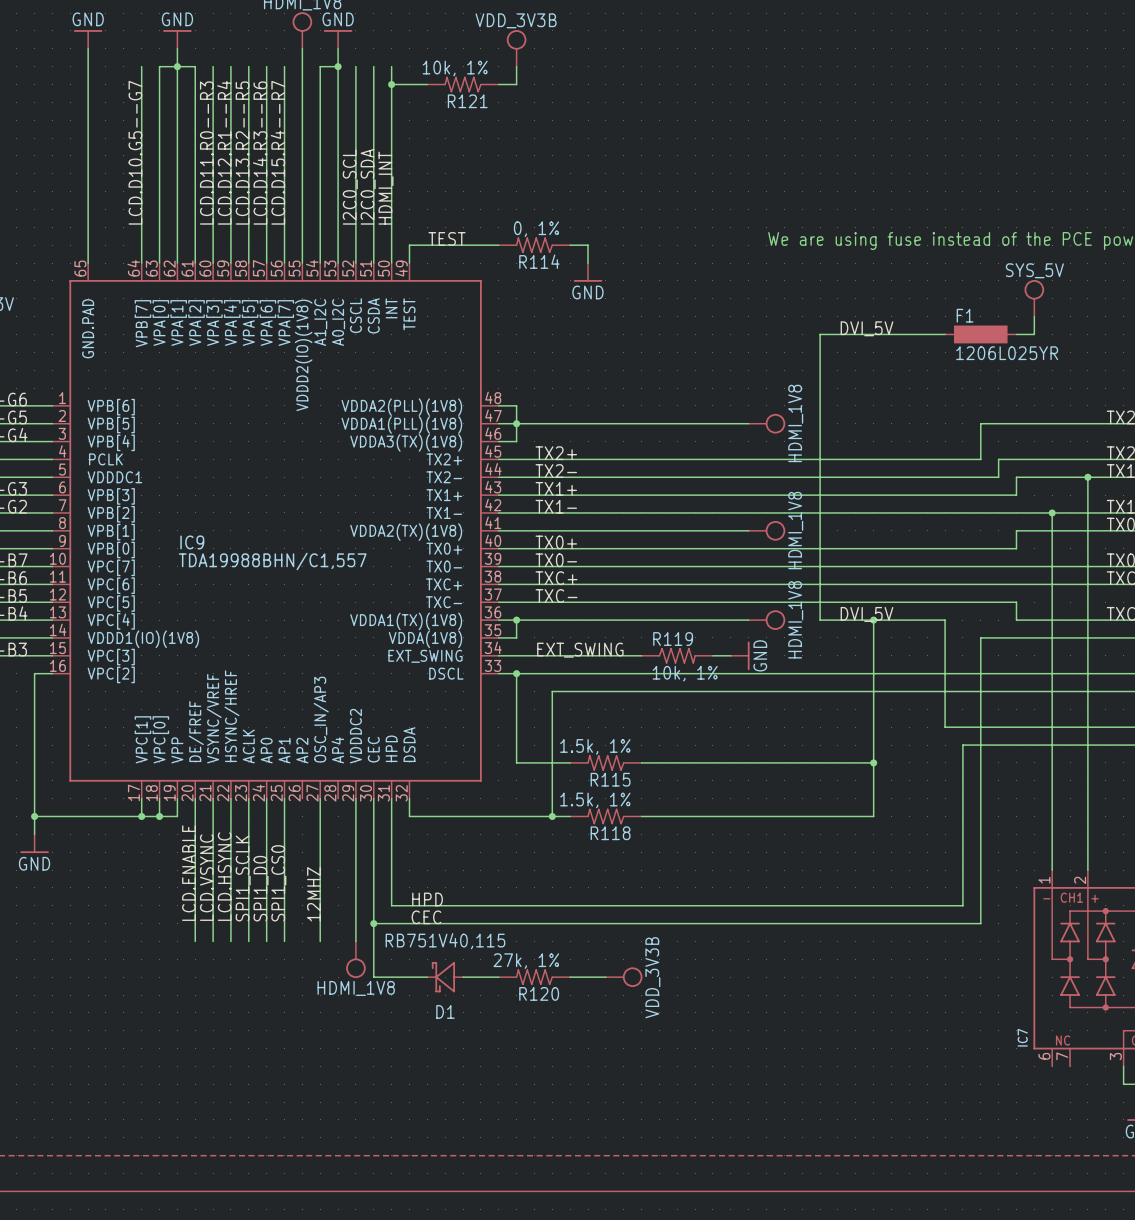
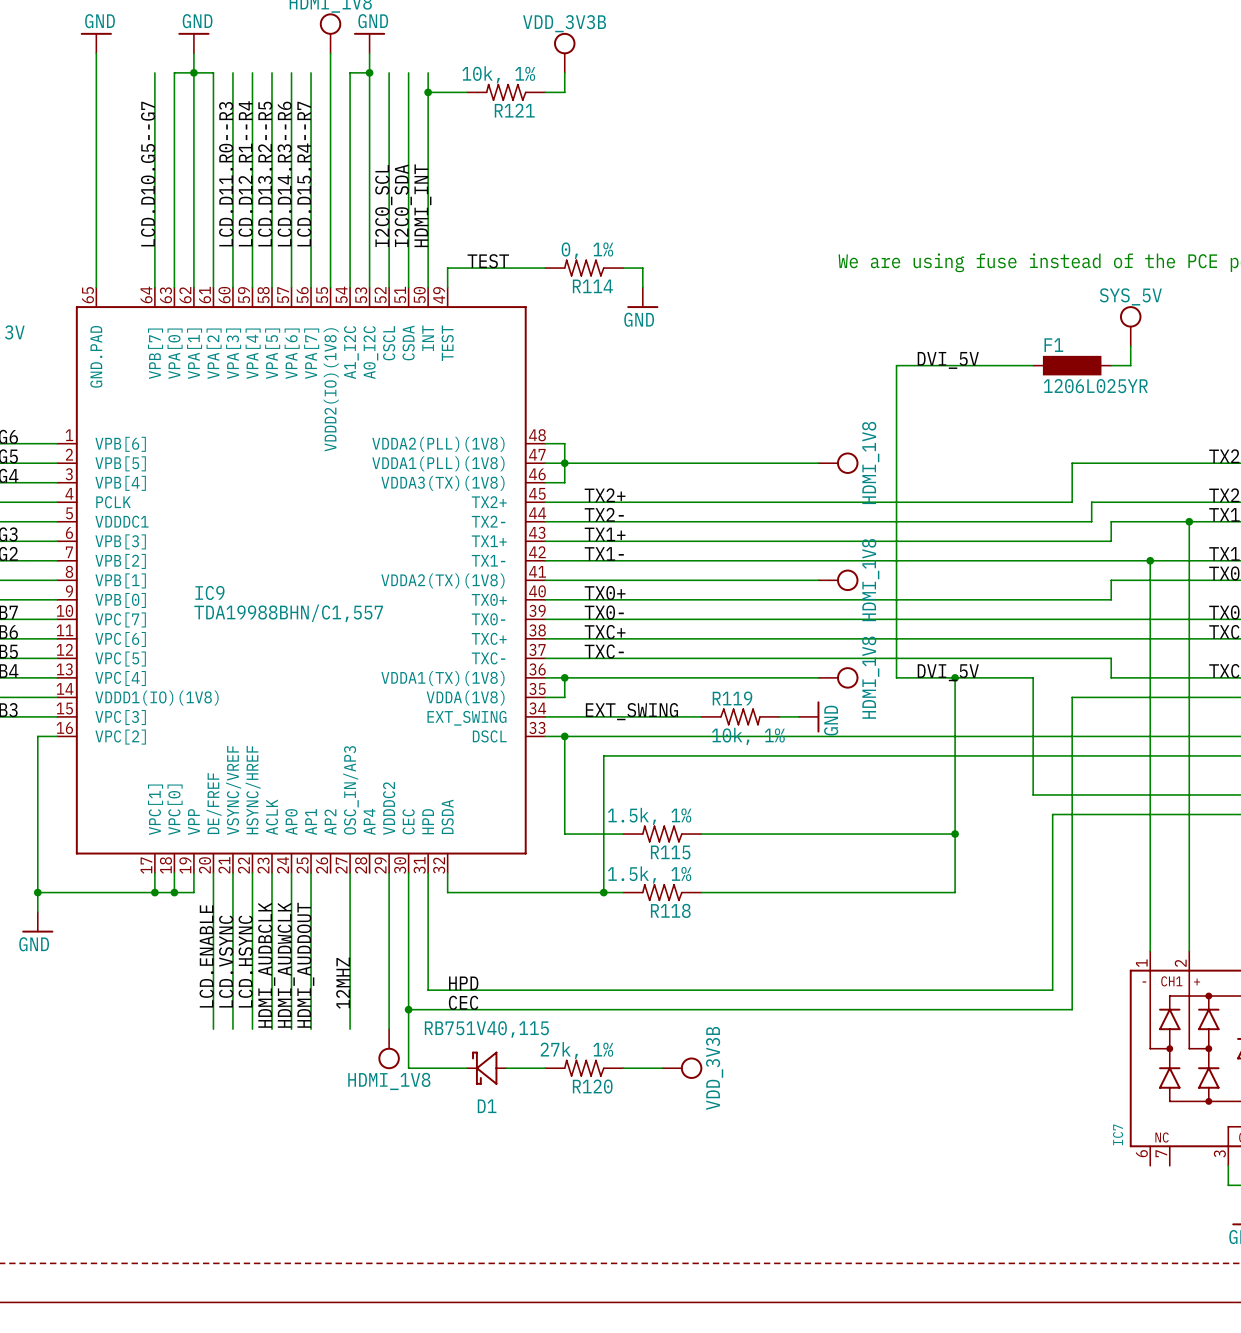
label: none -> HDMI_AUDBCLK (266, 965)
label: none -> HDMI_AUDWCLK (286, 965)
label: none -> HDMI_AUDDOUT (305, 965)
label: SPI1_SCLK (243, 878) -> none
label: SPI1_CS0 (278, 883) -> none
label: SPI1_D0 (261, 888) -> none

